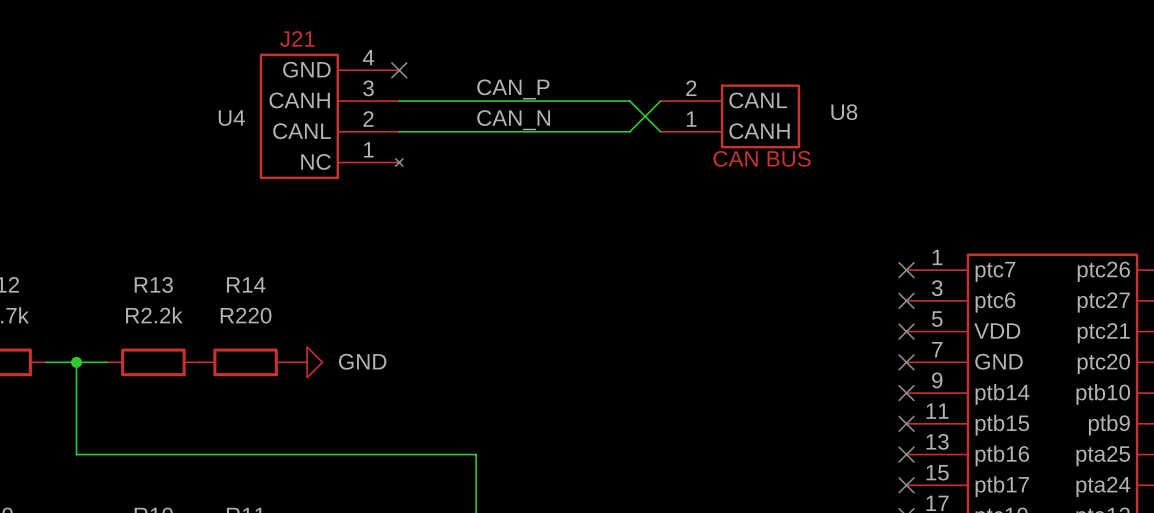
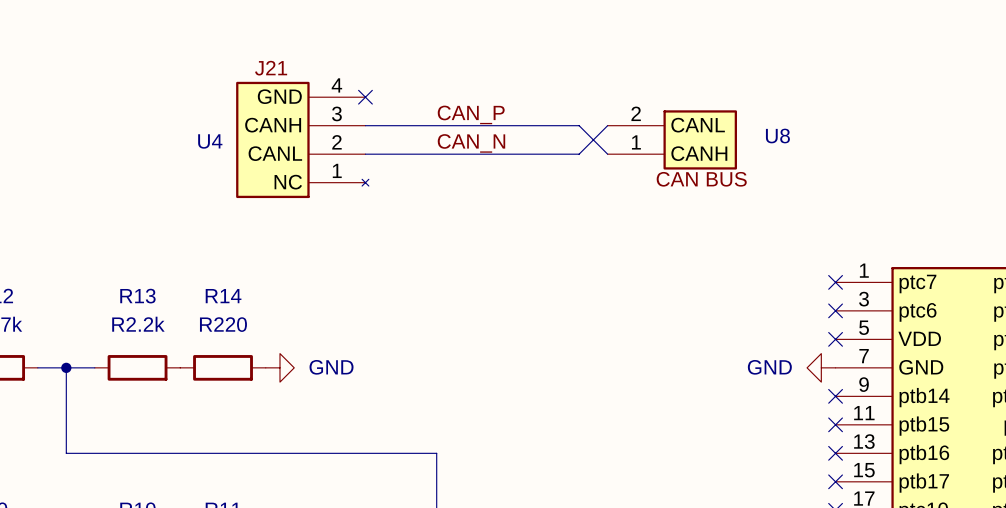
power symbol: none -> GND (821, 367)
no-connect mark: (906, 362) -> none

